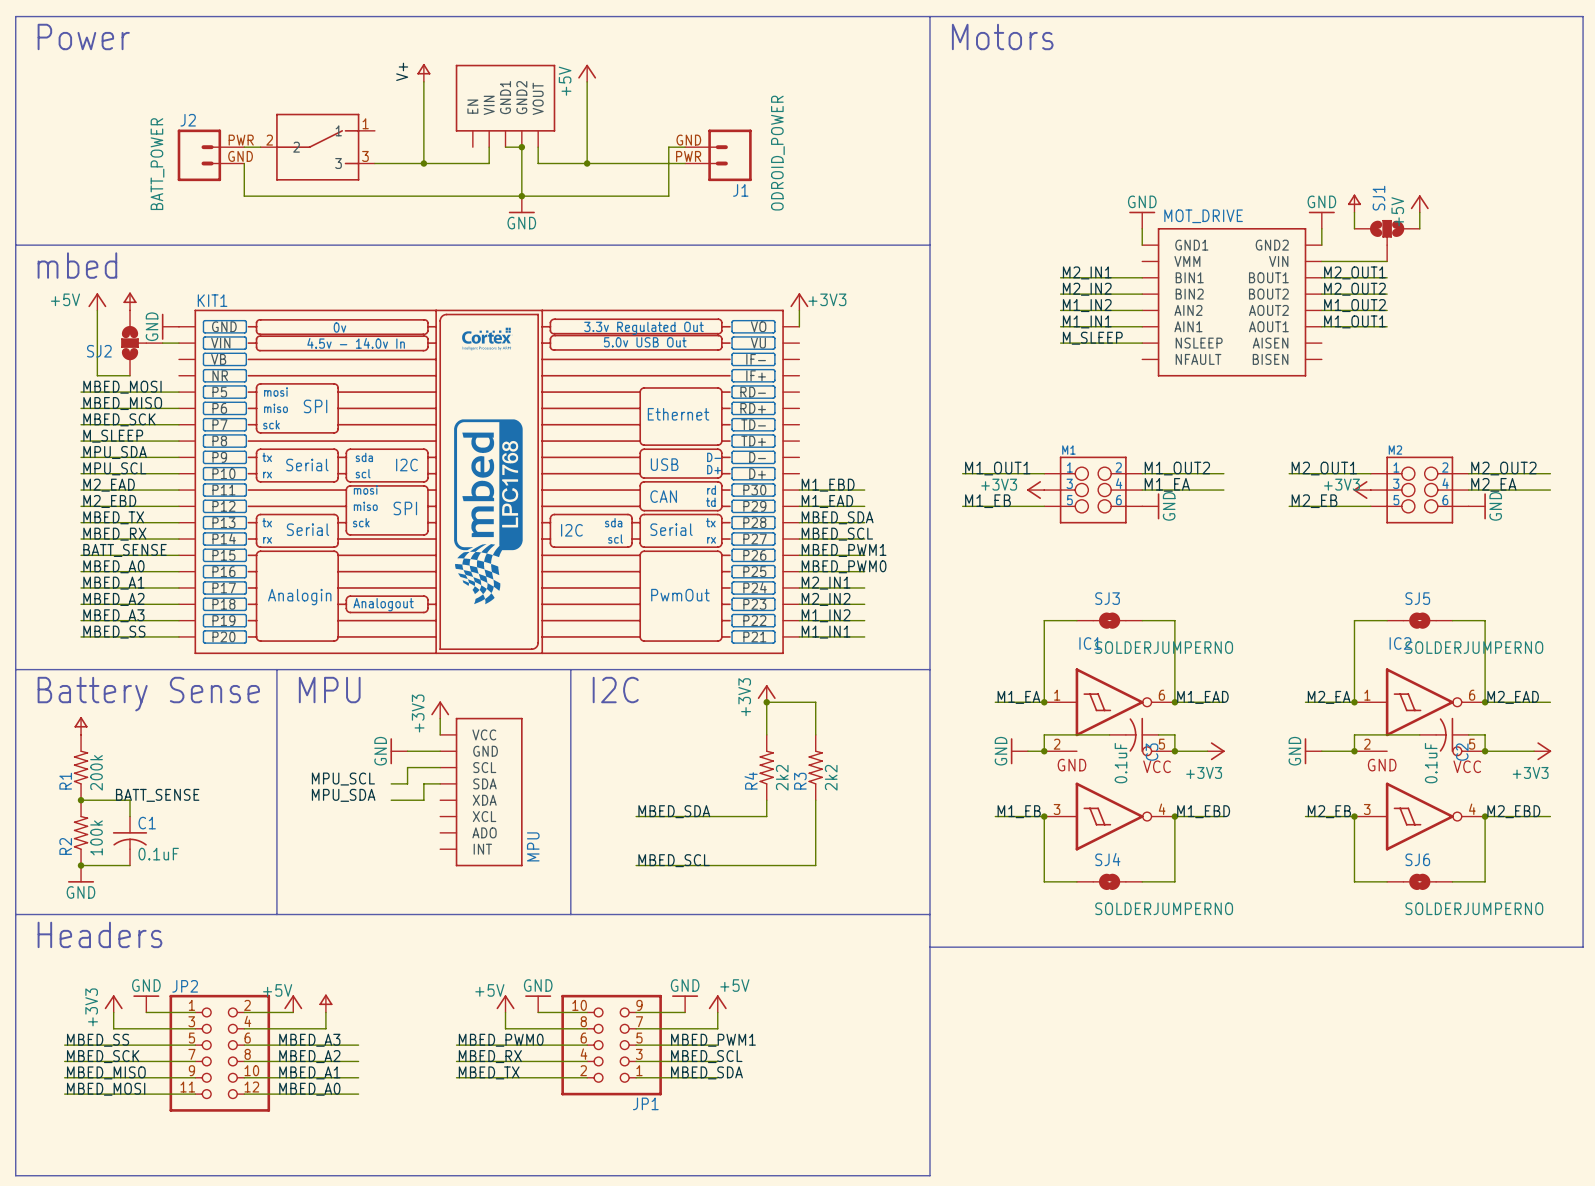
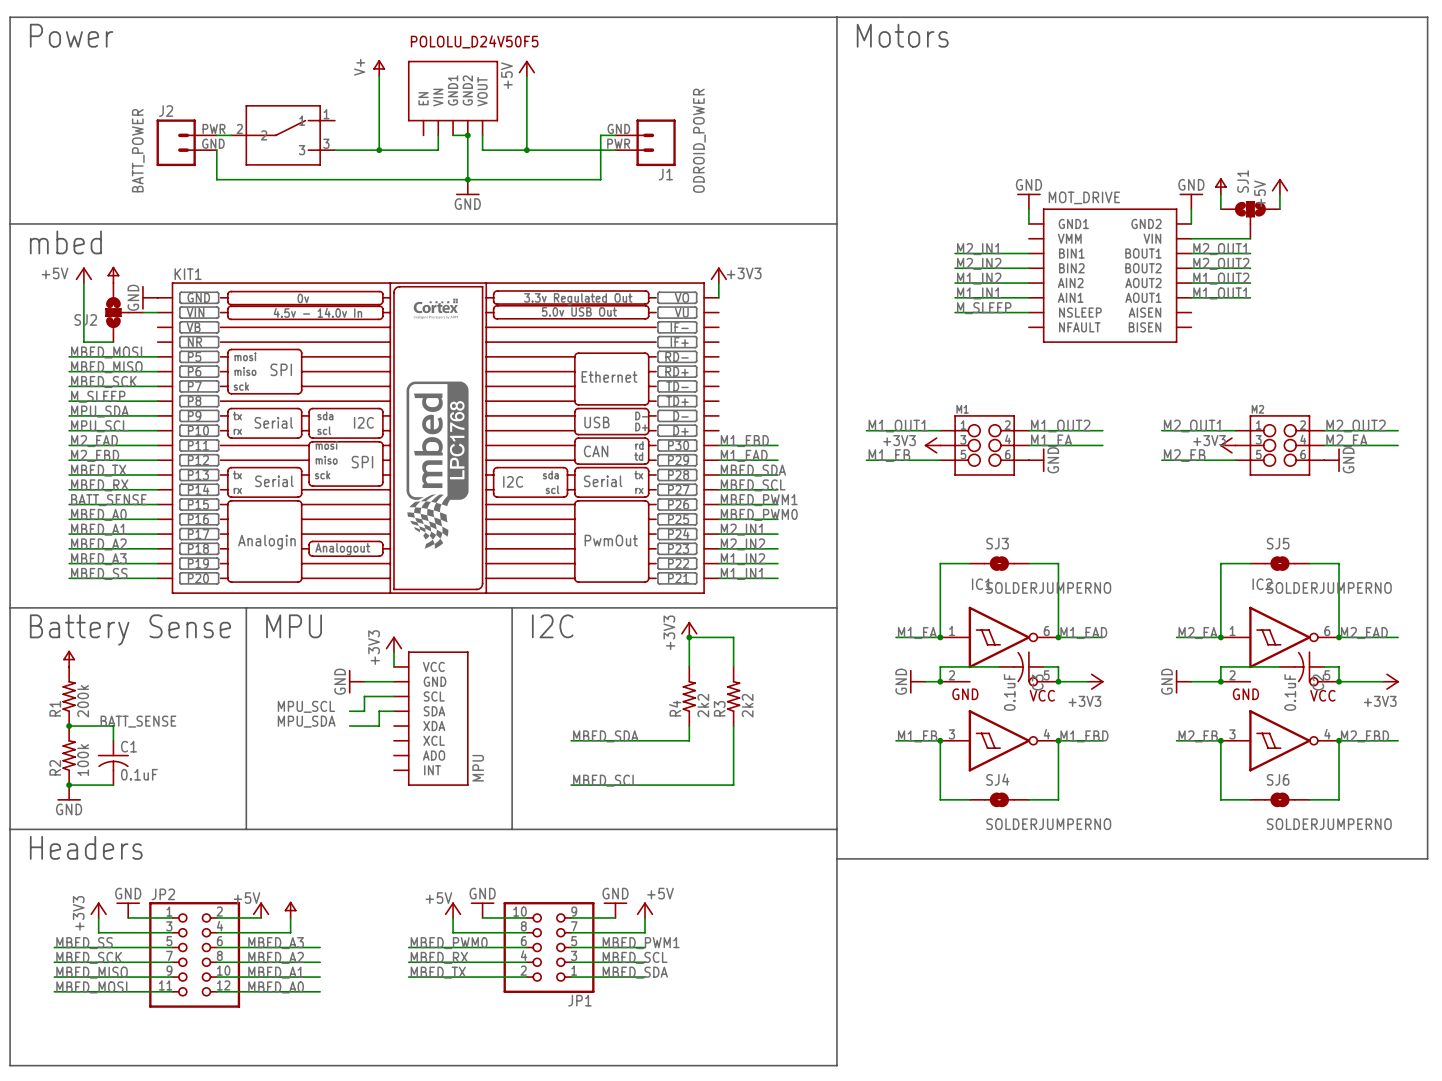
part value: none -> POLOLU_D24V50F5 (474, 41)

